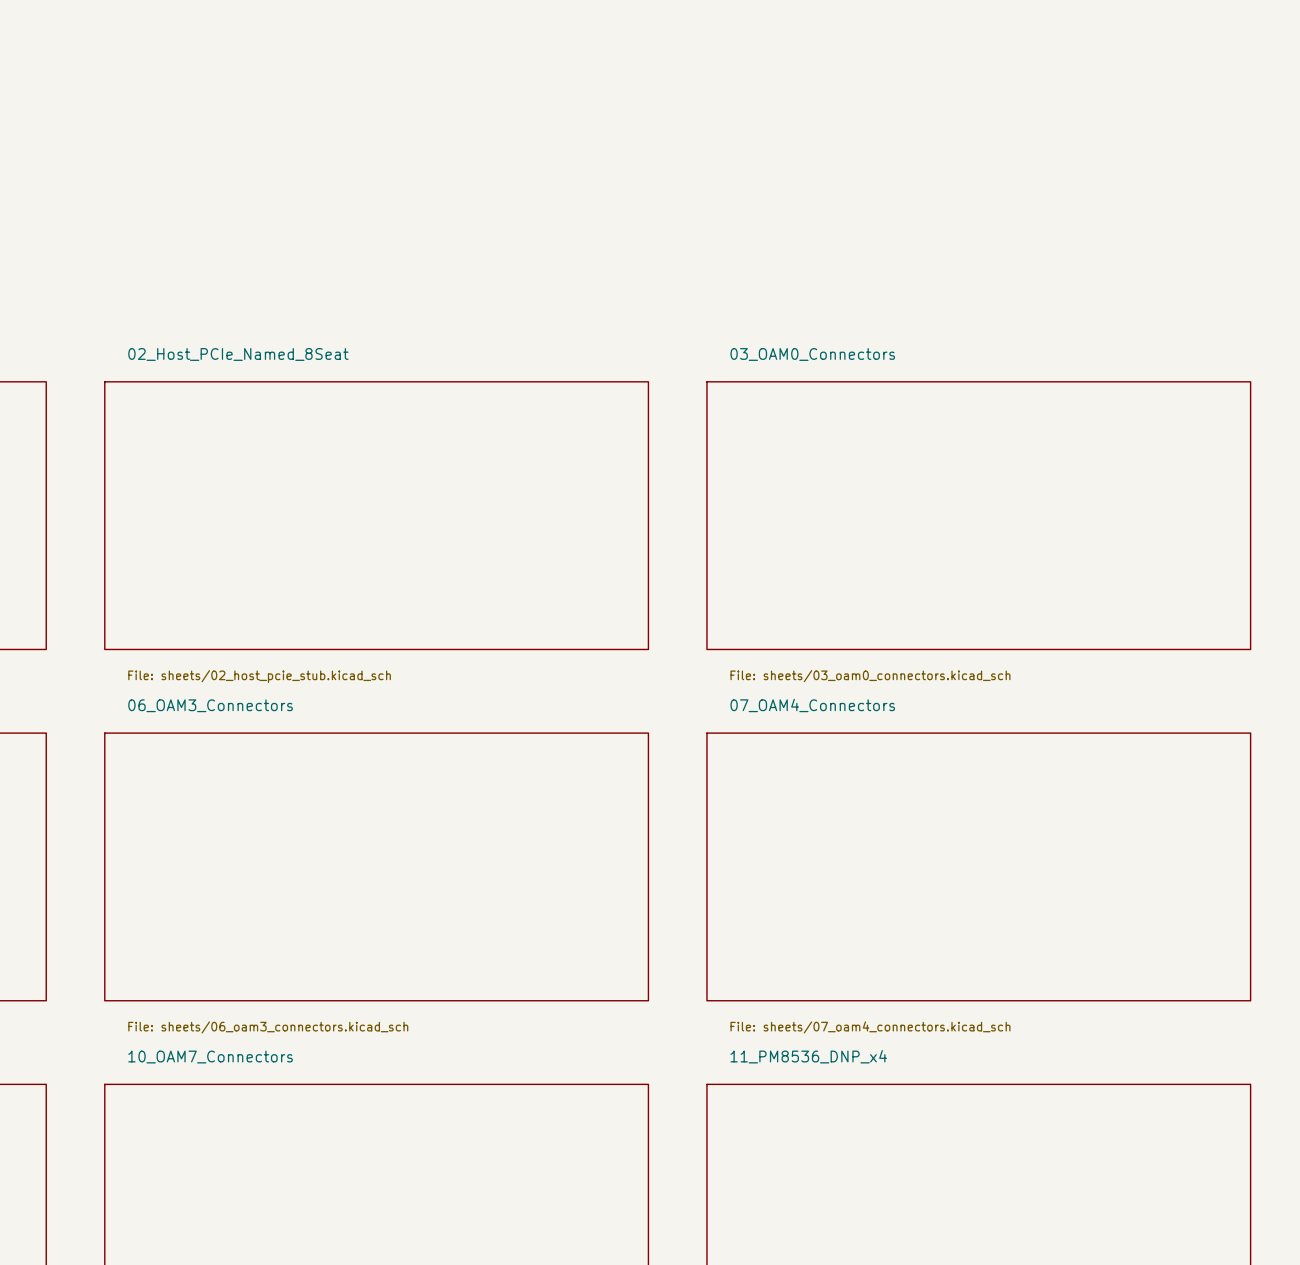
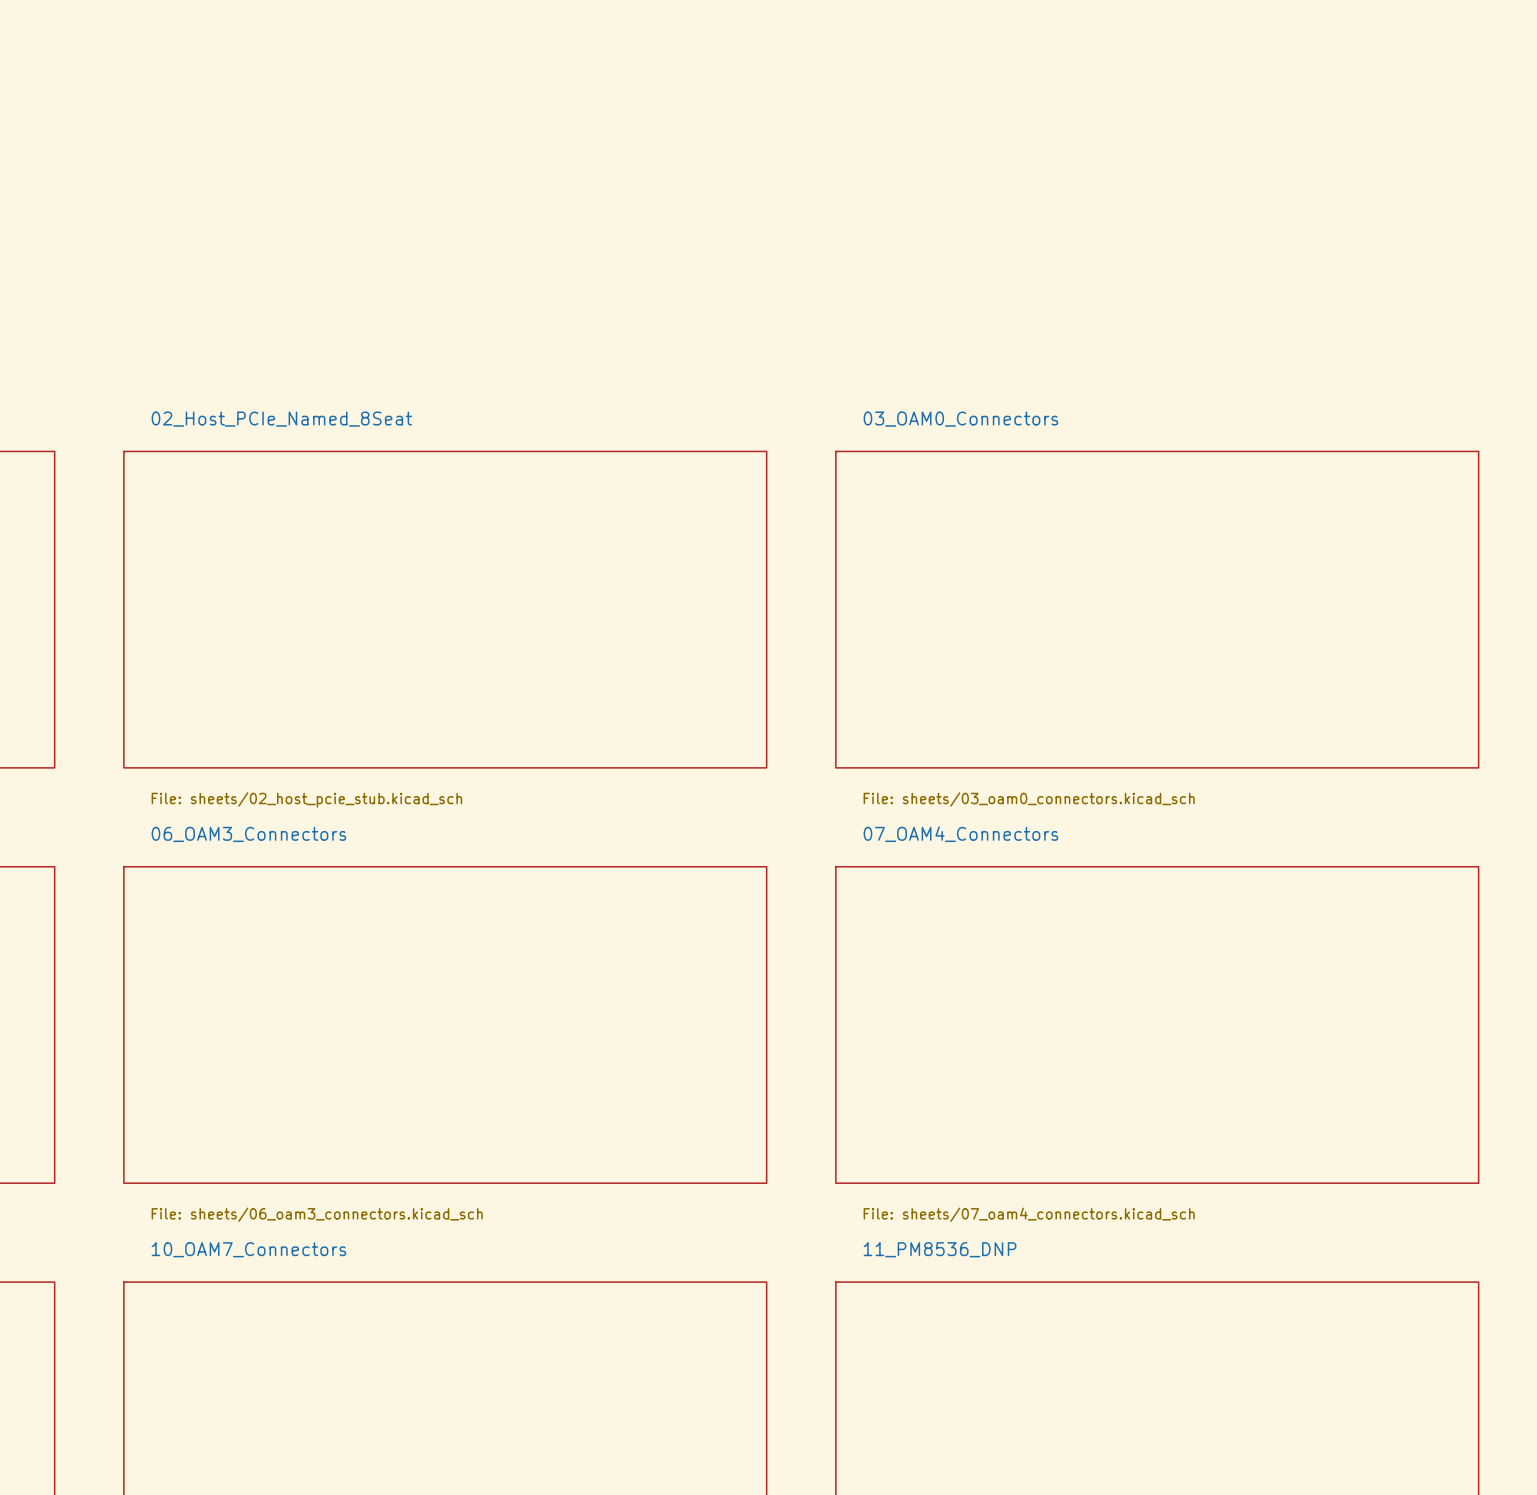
sheet 11_PM8536_DNP_x4 name: 11_PM8536_DNP_x4 (808, 1056) -> 11_PM8536_DNP (940, 1249)

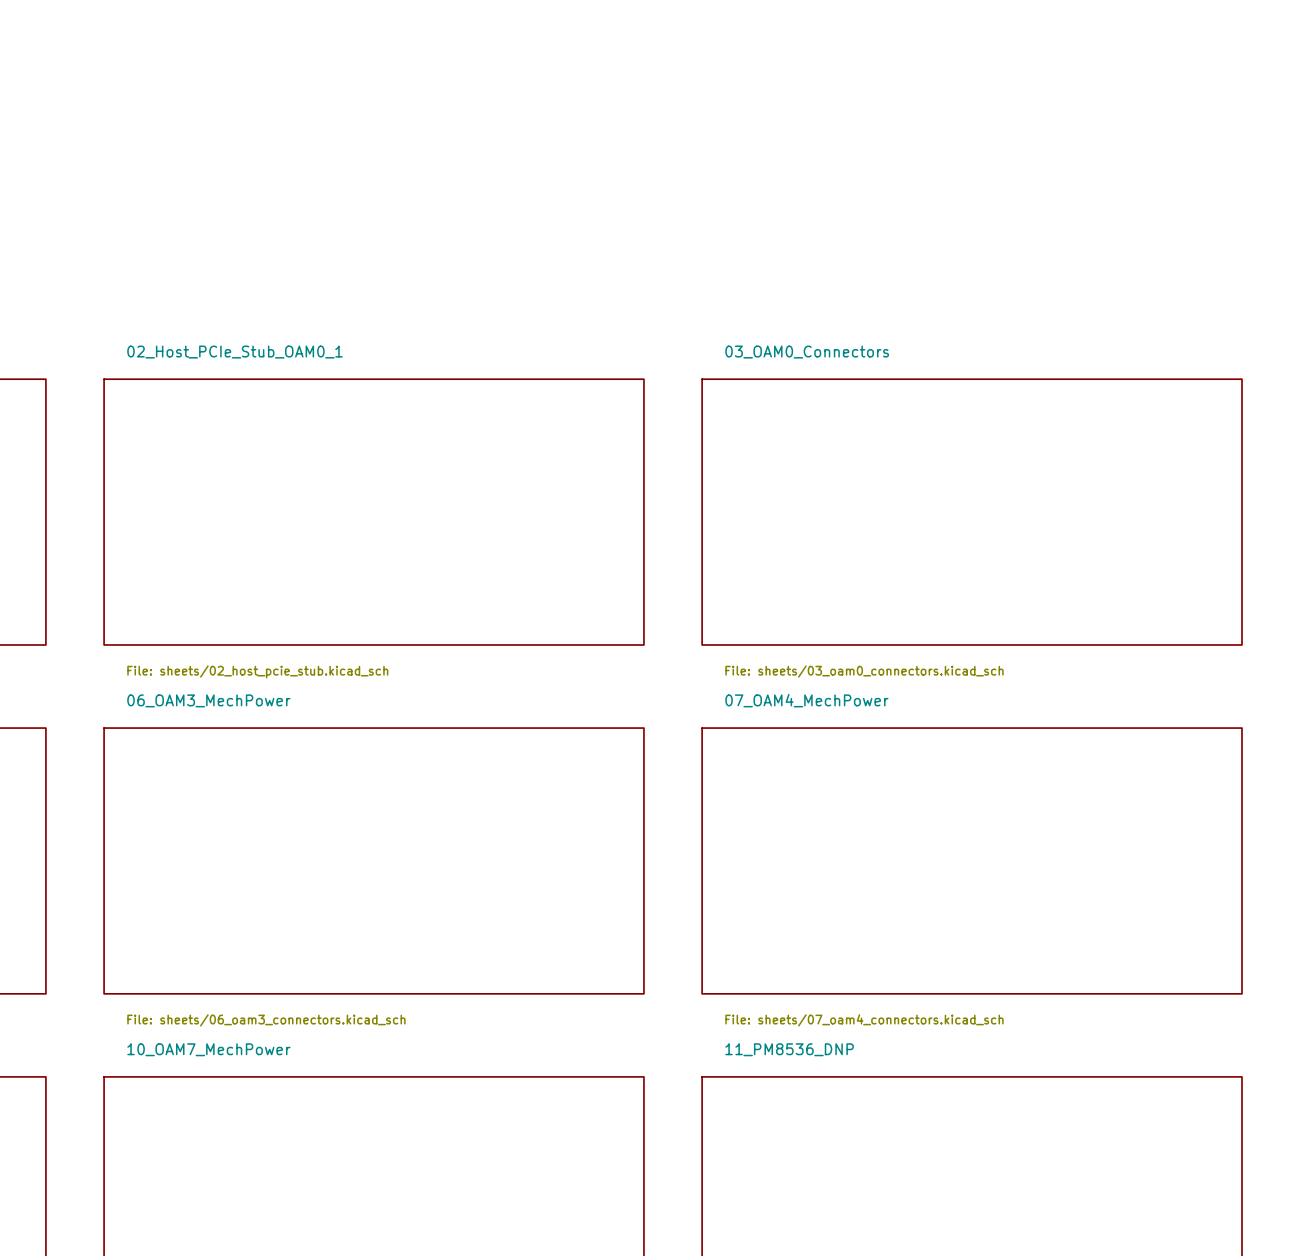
sheet 02_Host_PCIe_Named_8Seat name: 02_Host_PCIe_Named_8Seat (281, 419) -> 02_Host_PCIe_Stub_OAM0_1 (235, 352)
sheet 06_OAM3_Connectors name: 06_OAM3_Connectors (248, 834) -> 06_OAM3_MechPower (208, 700)
sheet 07_OAM4_Connectors name: 07_OAM4_Connectors (960, 834) -> 07_OAM4_MechPower (806, 700)
sheet 10_OAM7_Connectors name: 10_OAM7_Connectors (248, 1249) -> 10_OAM7_MechPower (208, 1049)

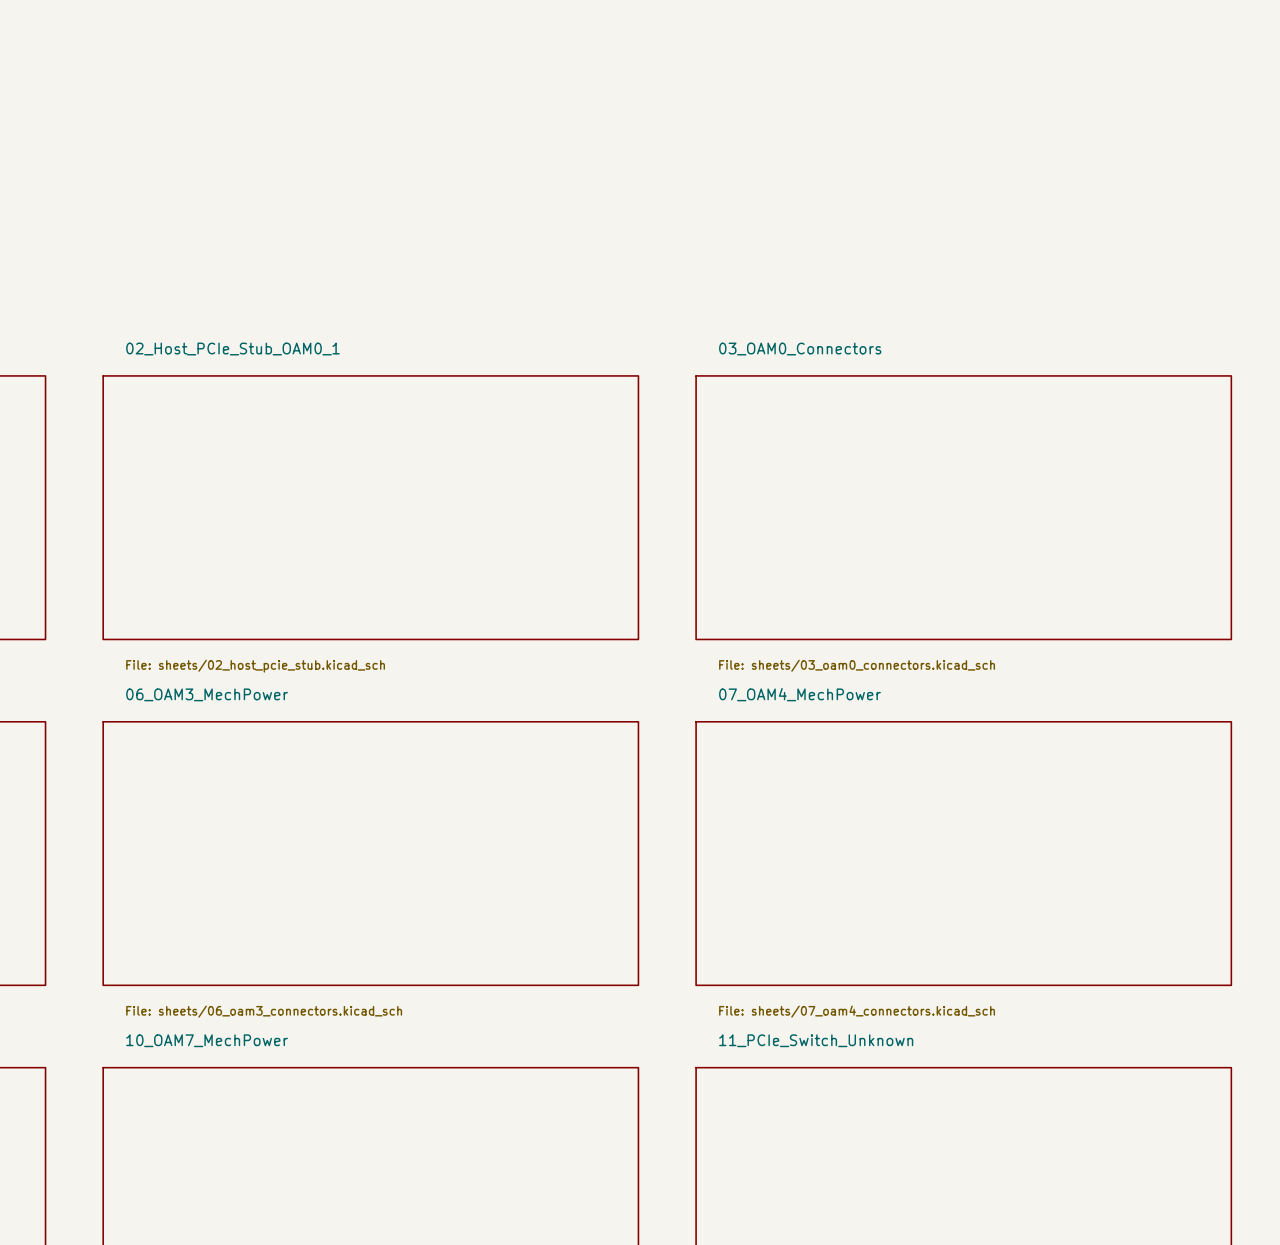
sheet 11_PM8536_DNP name: 11_PM8536_DNP (789, 1049) -> 11_PCIe_Switch_Unknown (816, 1040)

